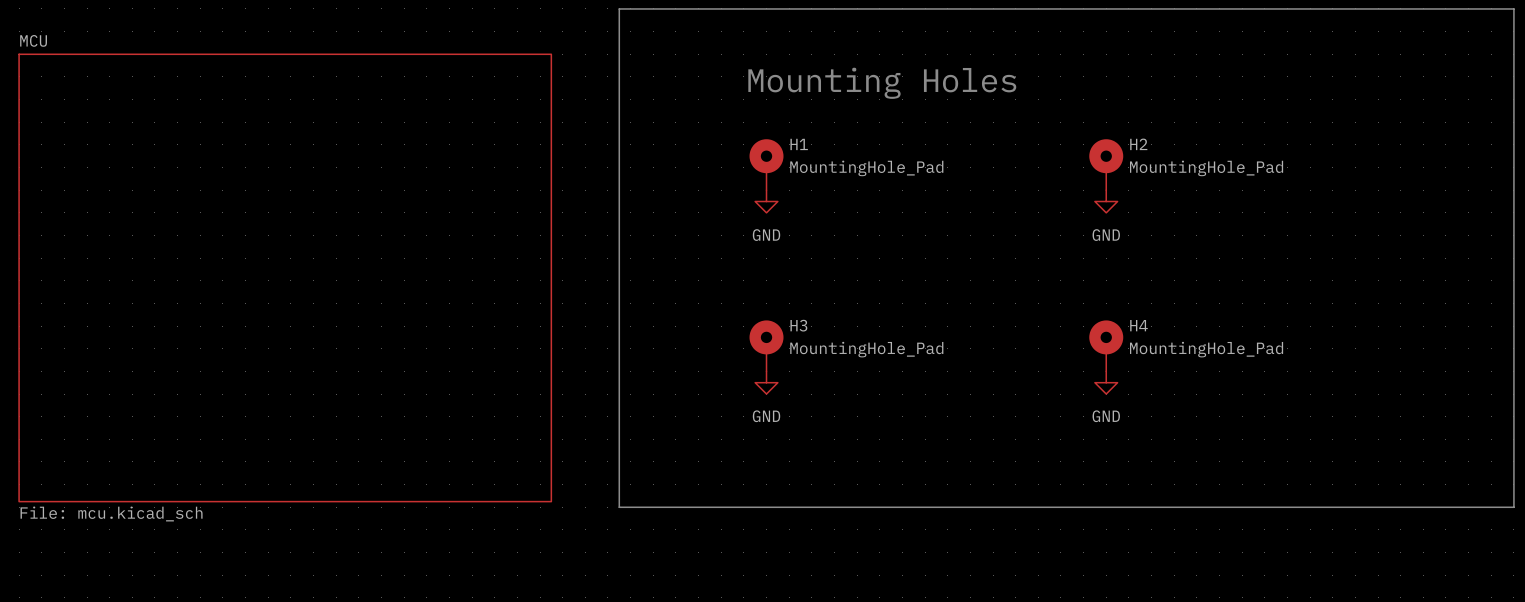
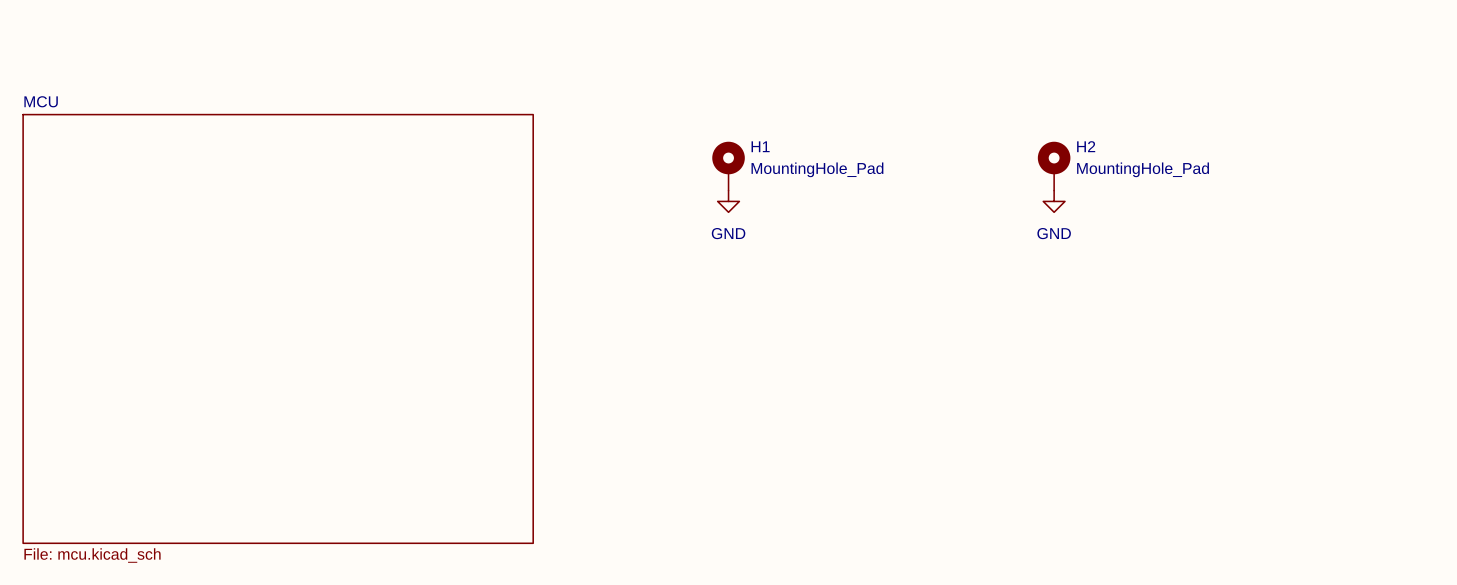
line: (619, 8) (1513, 8) (1513, 507) (619, 507) (619, 8) -> none
text: Mounting Holes (882, 83) -> none
sheet MCU position: (285, 277) -> (278, 328)
H3: MountingHole_Pad (766, 345) -> none
H4: MountingHole_Pad (1106, 345) -> none
power symbol: GND (766, 382) -> none
power symbol: GND (1106, 382) -> none

